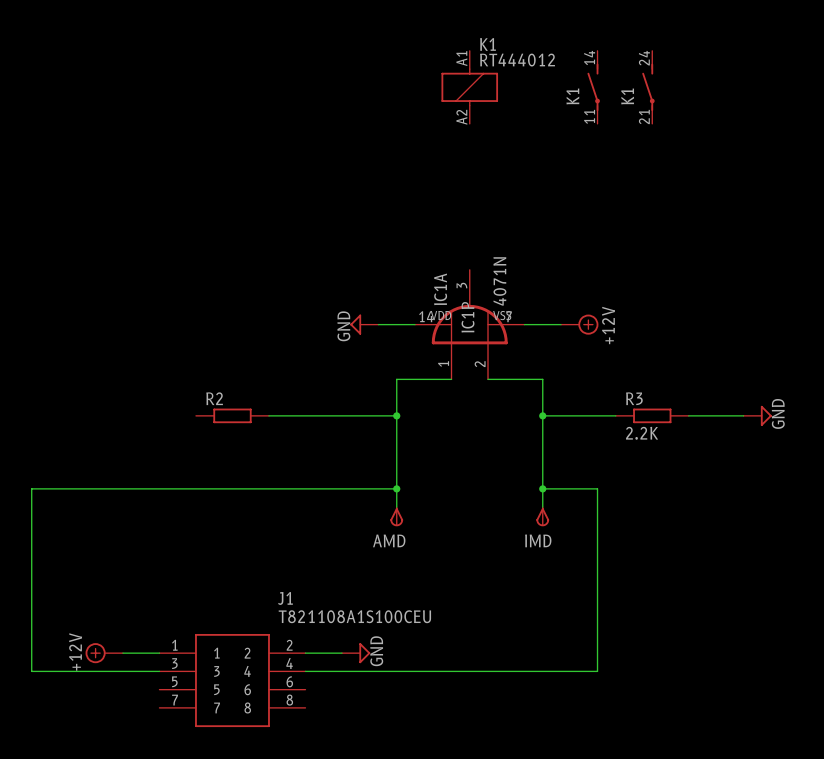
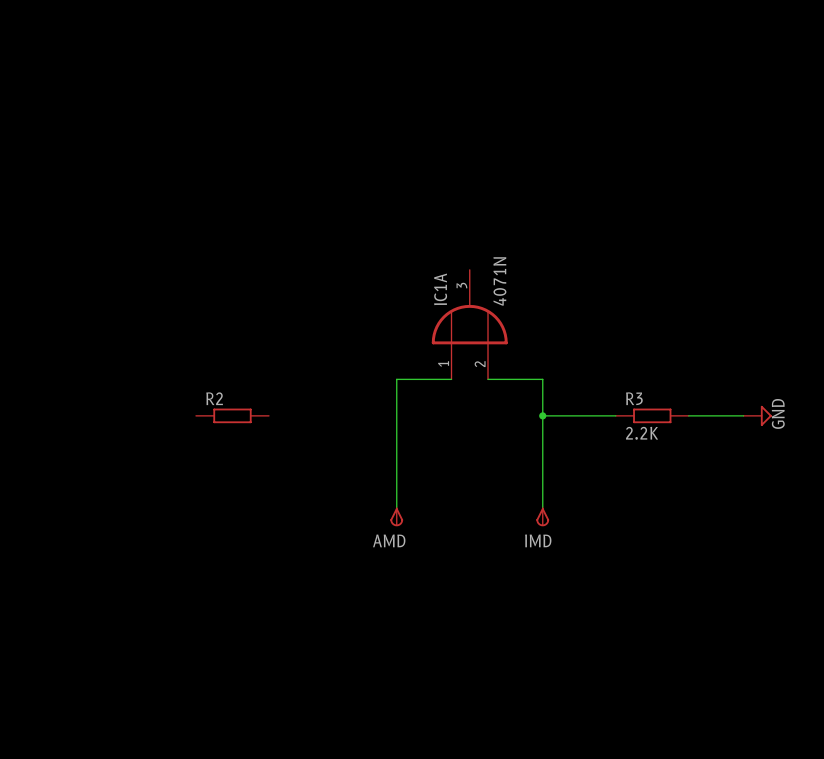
K1: RT444012 (469, 87) -> none
K1: (593, 87) -> none
K1: (648, 87) -> none
power symbol: GND (364, 324) -> none
wire: (378, 324) (414, 324) -> none
IC1P: (469, 324) -> none
wire: (524, 324) (561, 324) -> none
power symbol: +12V (579, 324) -> none
wire: (268, 415) (396, 415) -> none
junction: (396, 415) -> none
wire: (396, 488) (31, 488) (31, 671) (159, 671) -> none
junction: (396, 488) -> none
wire: (542, 488) (597, 488) (597, 671) (305, 671) -> none
junction: (542, 488) -> none
power symbol: +12V (104, 653) -> none
wire: (122, 653) (159, 653) -> none
wire: (305, 653) (341, 653) -> none
power symbol: GND (356, 653) -> none
J1: T821108A1S100CEU (232, 680) -> none

